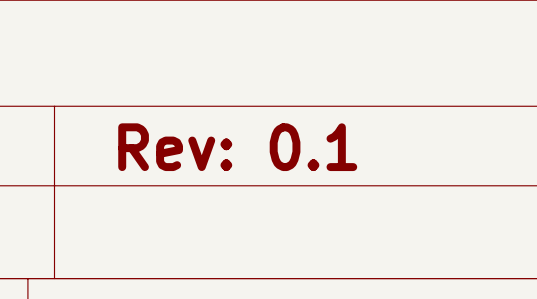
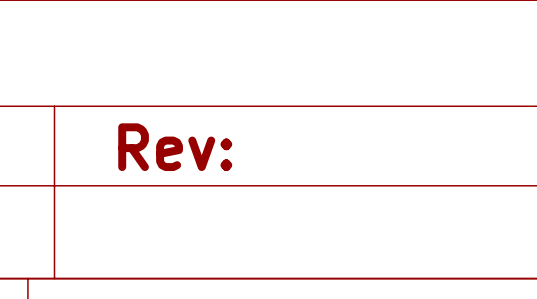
title block: Rev: 0.1 (237, 147) -> Rev: (175, 147)

